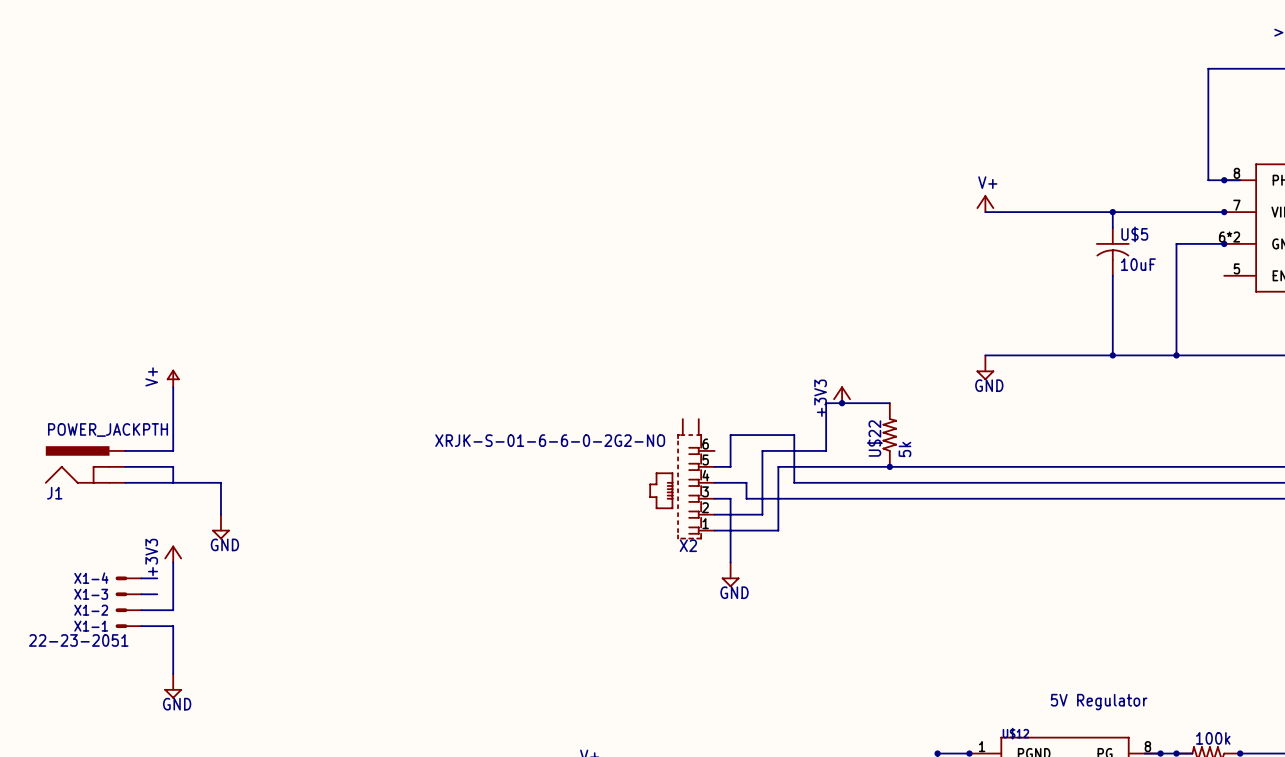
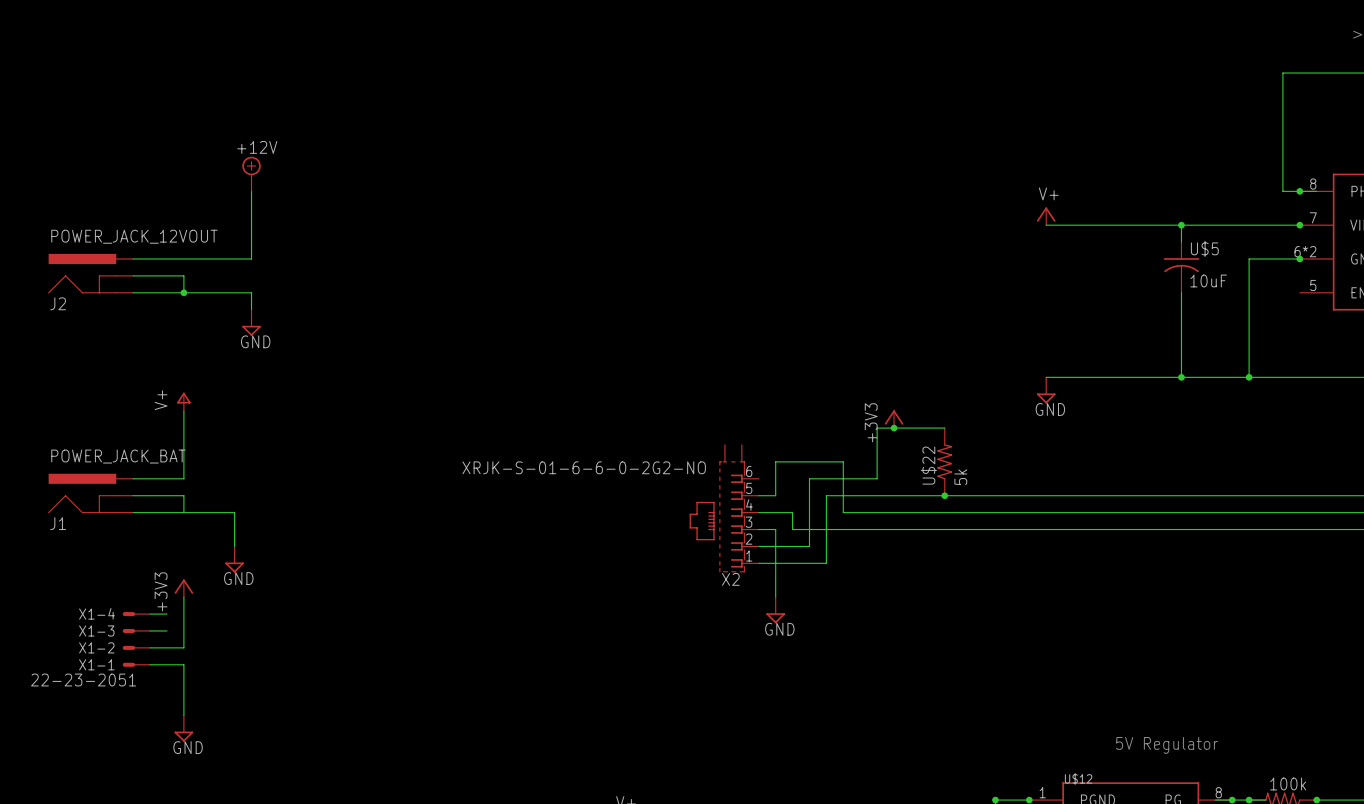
power symbol: none -> +12V (251, 174)
wire: none -> (251, 191) (251, 258) (133, 258)
J2: none -> POWER_JACK_12VOUT (90, 273)
wire: none -> (133, 275) (183, 275) (183, 292)
wire: none -> (133, 292) (251, 292) (251, 309)
junction: none -> (183, 292)
power symbol: none -> GND (251, 322)
J1 value: POWER_JACKPTH (108, 430) -> POWER_JACK_BAT (118, 456)

